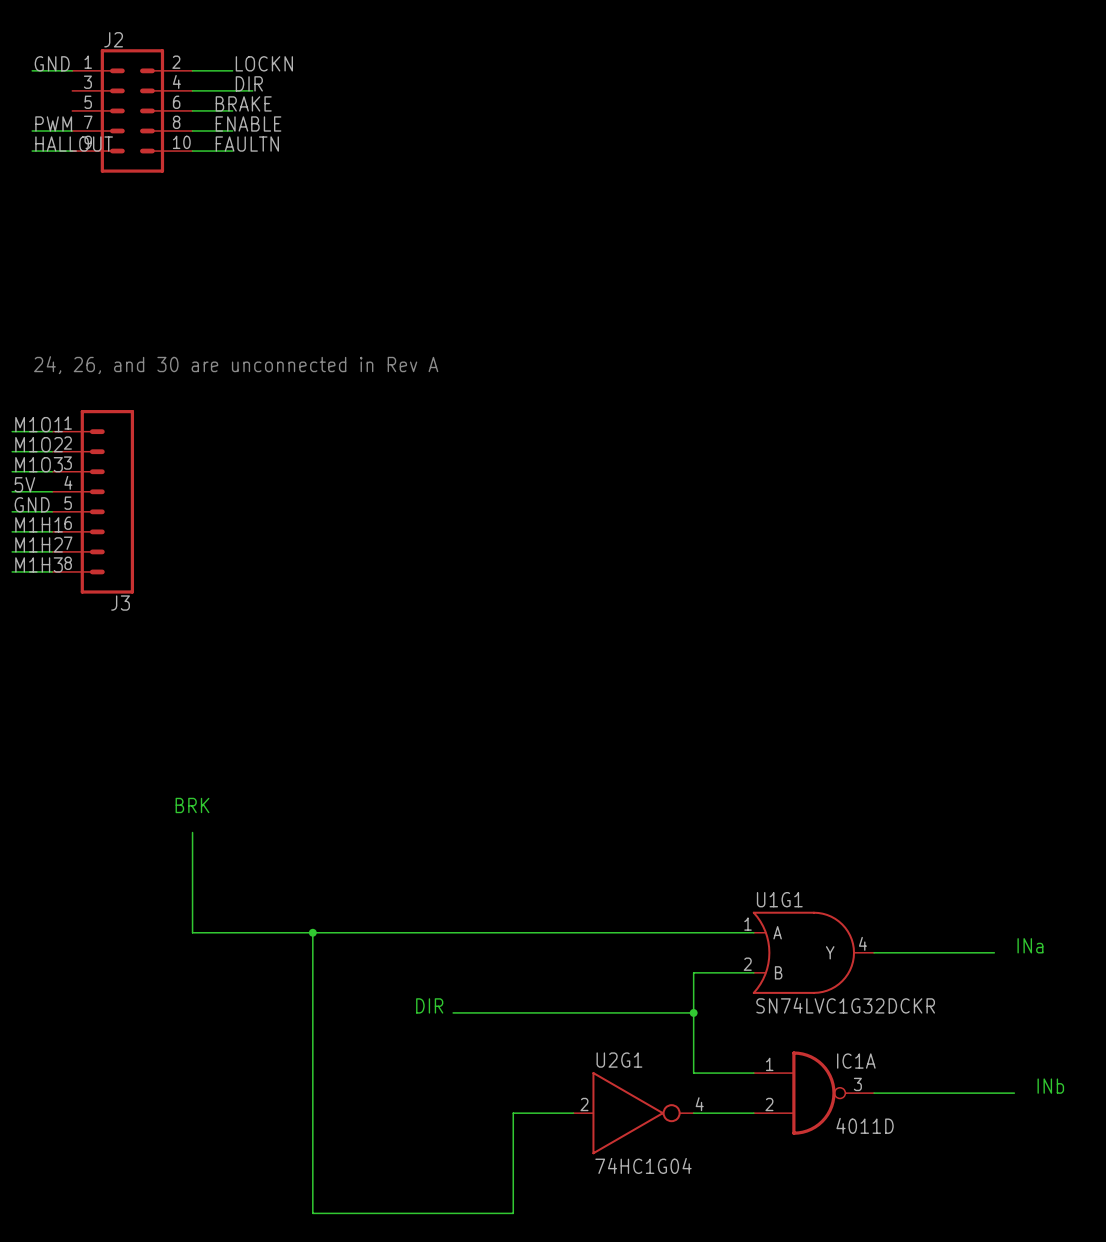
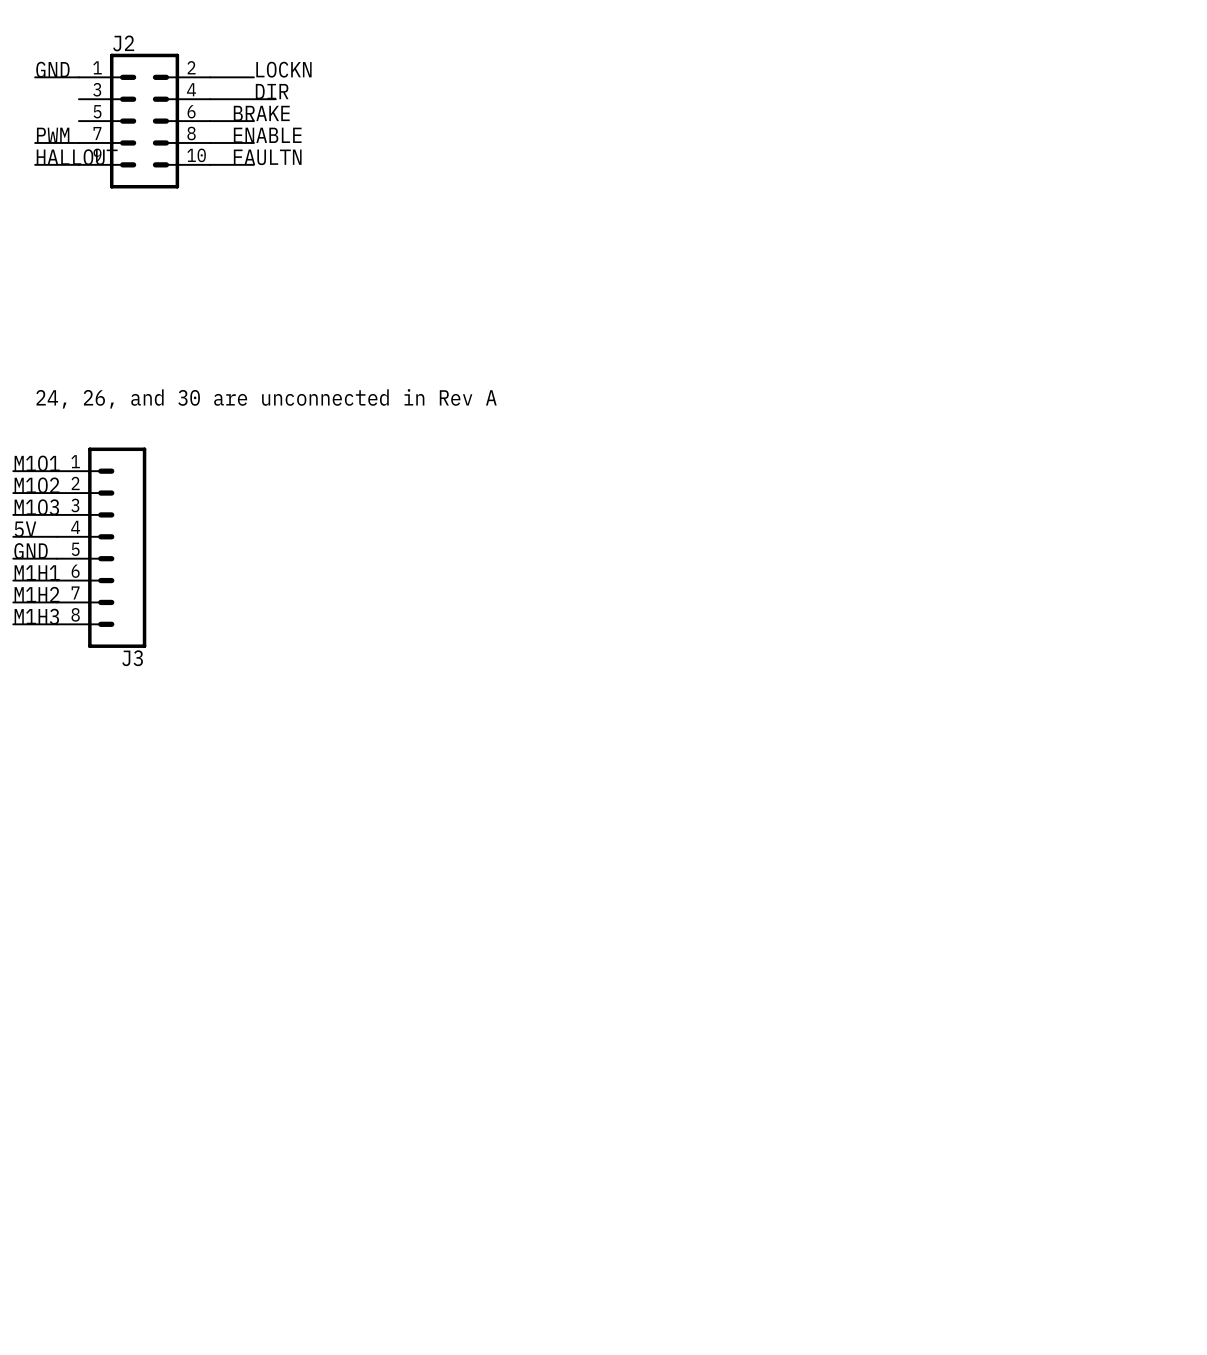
text: BRK (192, 805) -> none
wire: (192, 832) (192, 932) (753, 932) -> none
wire: (312, 932) (312, 1213) (513, 1213) (513, 1113) (573, 1113) -> none
junction: (312, 932) -> none
text: INa (1030, 945) -> none
U1G1: SN74LVC1G32DCKR (813, 952) -> none
wire: (874, 952) (994, 952) -> none
wire: (753, 972) (693, 972) (693, 1073) (753, 1073) -> none
text: DIR (429, 1005) -> none
wire: (453, 1012) (693, 1012) -> none
junction: (693, 1012) -> none
text: INb (1050, 1086) -> none
IC1A: 4011D (813, 1093) -> none
wire: (874, 1093) (1014, 1093) -> none
U2G1: 74HC1G04 (633, 1113) -> none
wire: (693, 1113) (753, 1113) -> none

